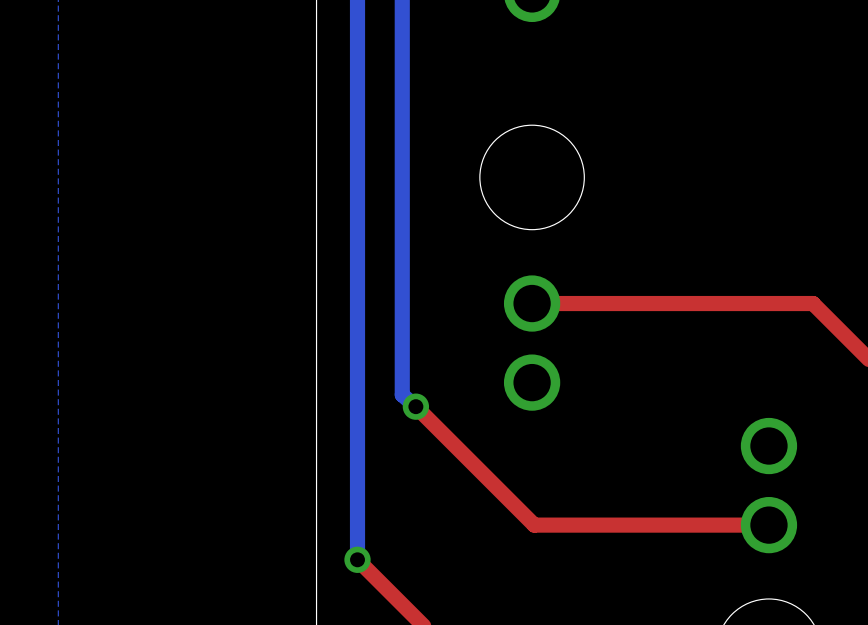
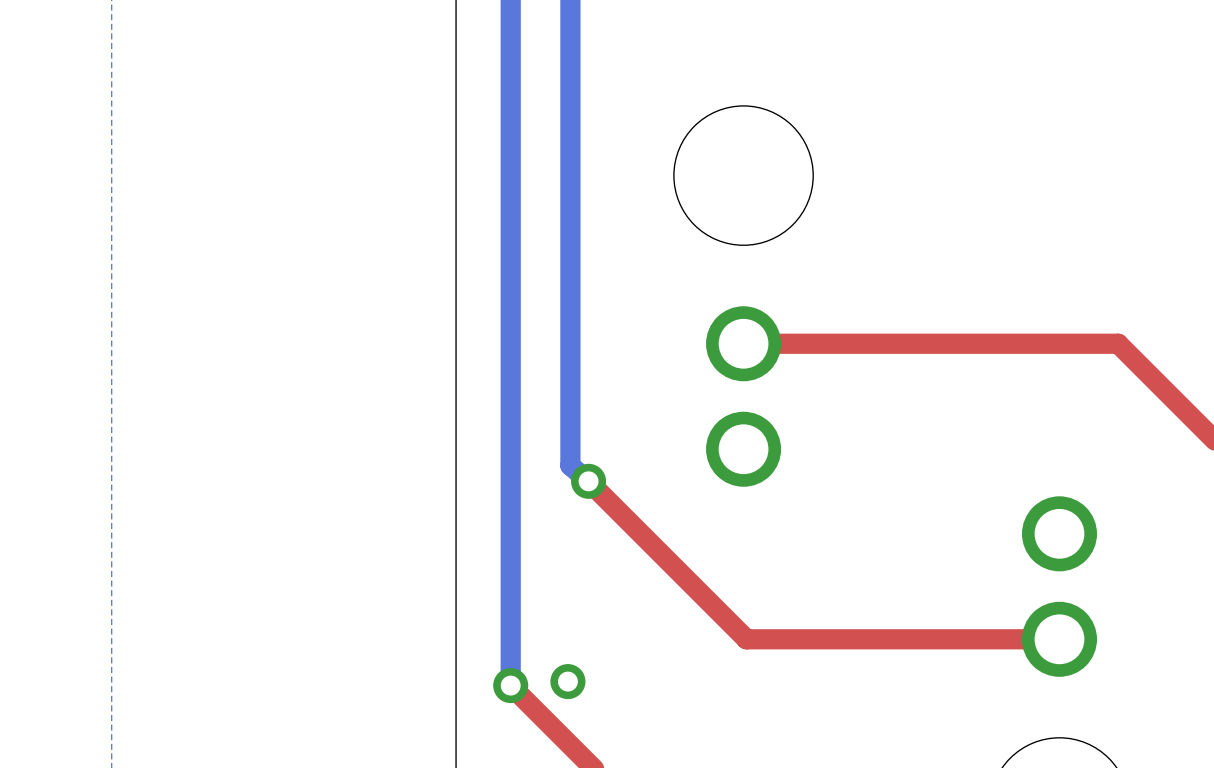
via: none -> (567, 681)

